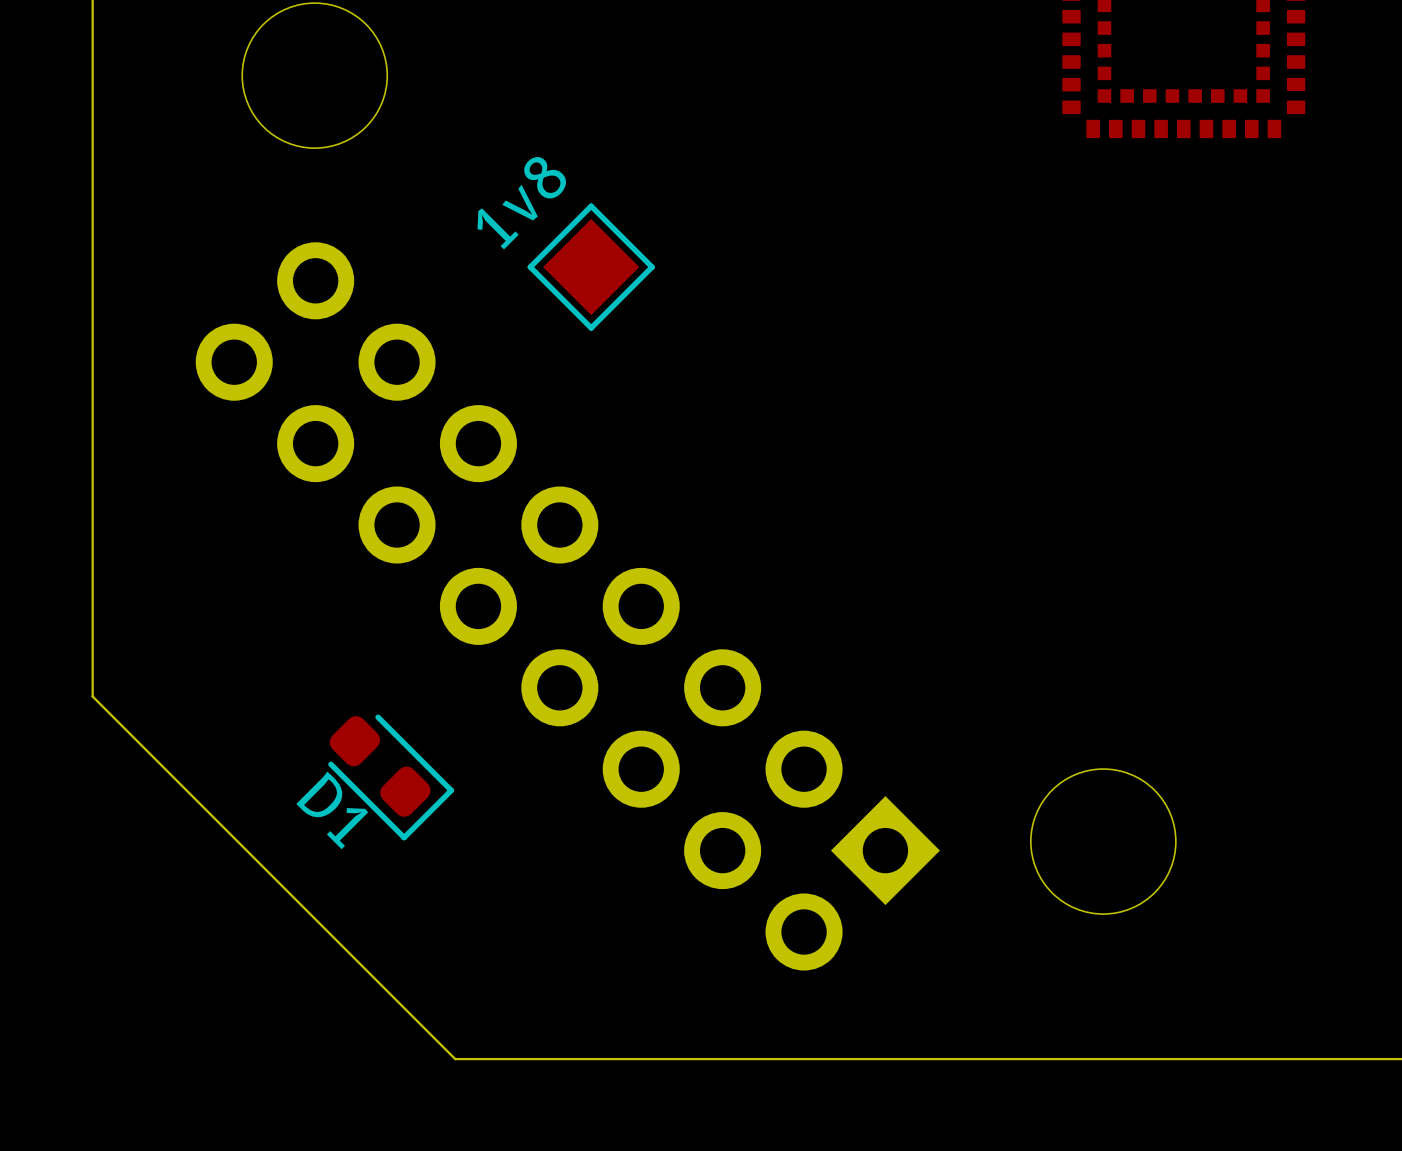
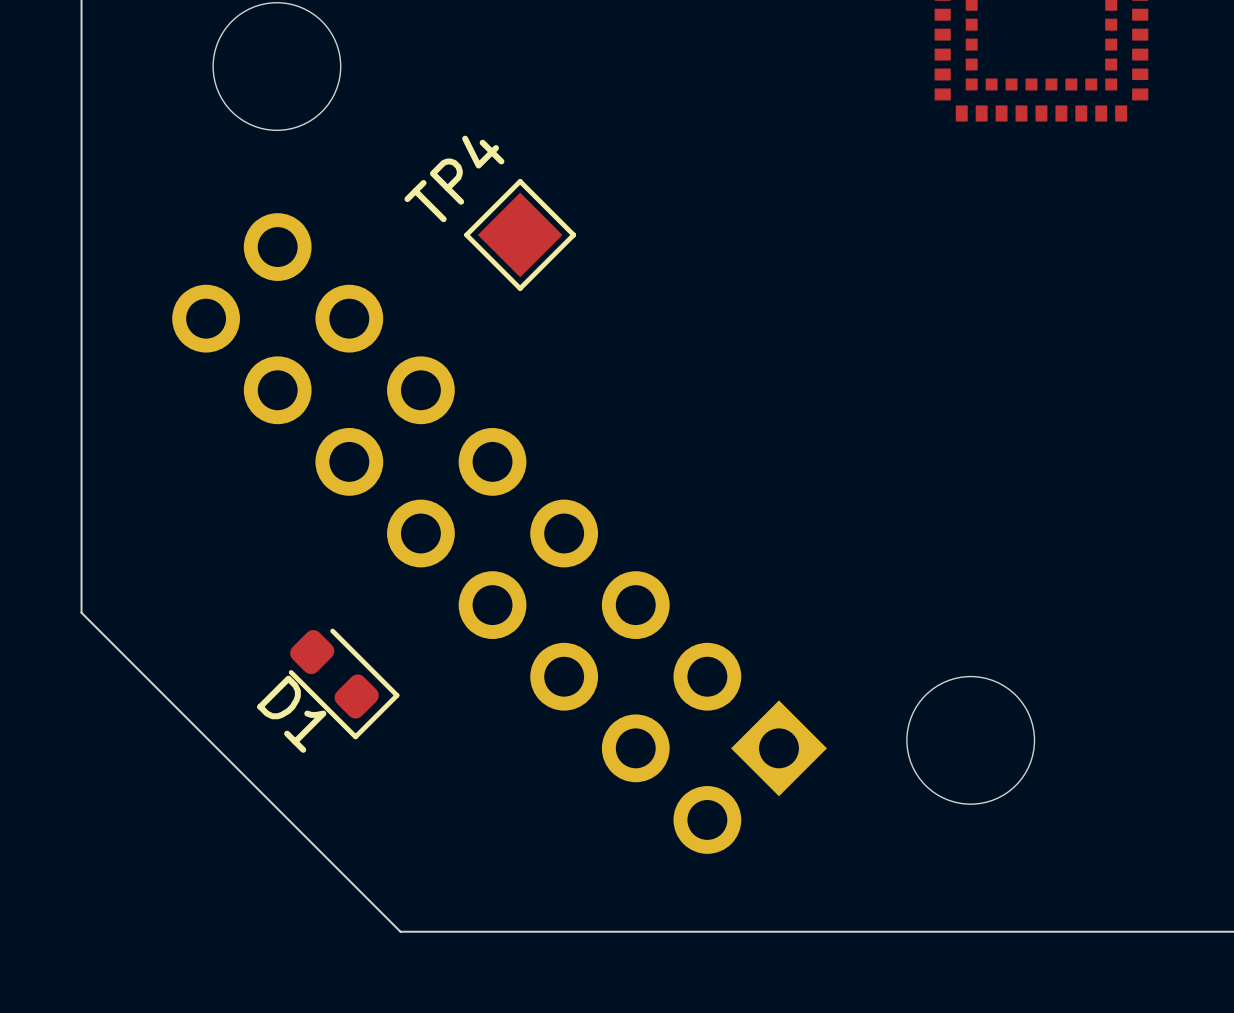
1v8 name: 1v8 (521, 203) -> TP4 (454, 178)

